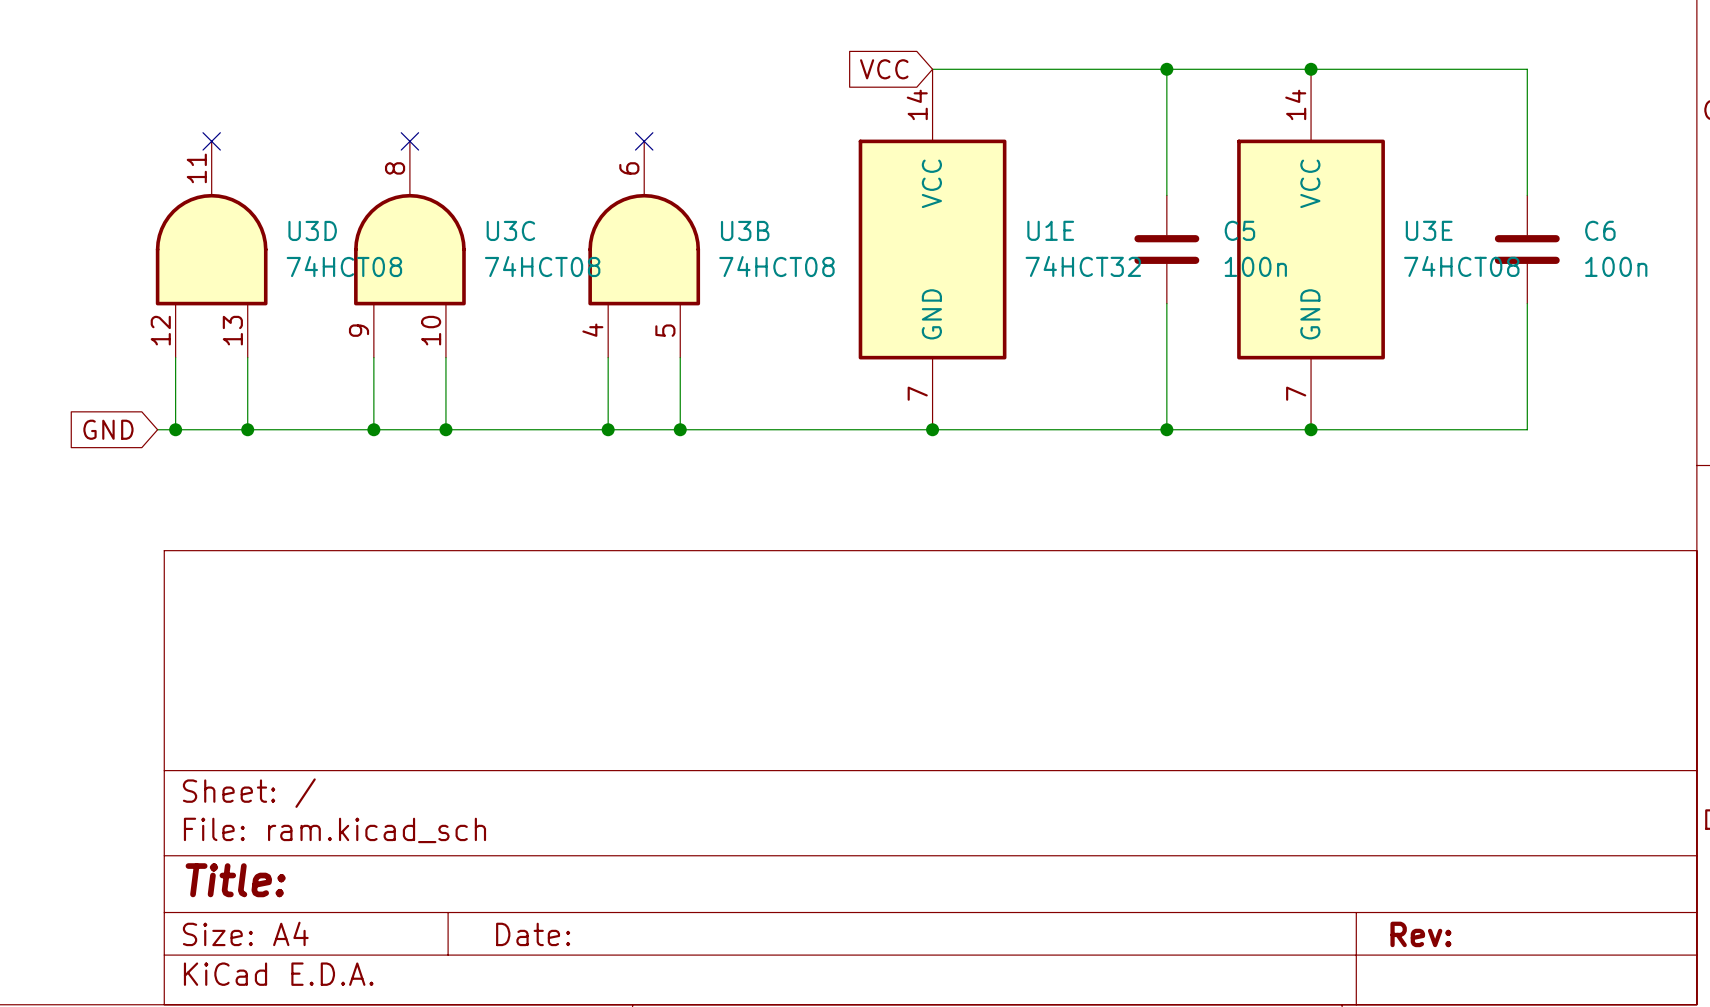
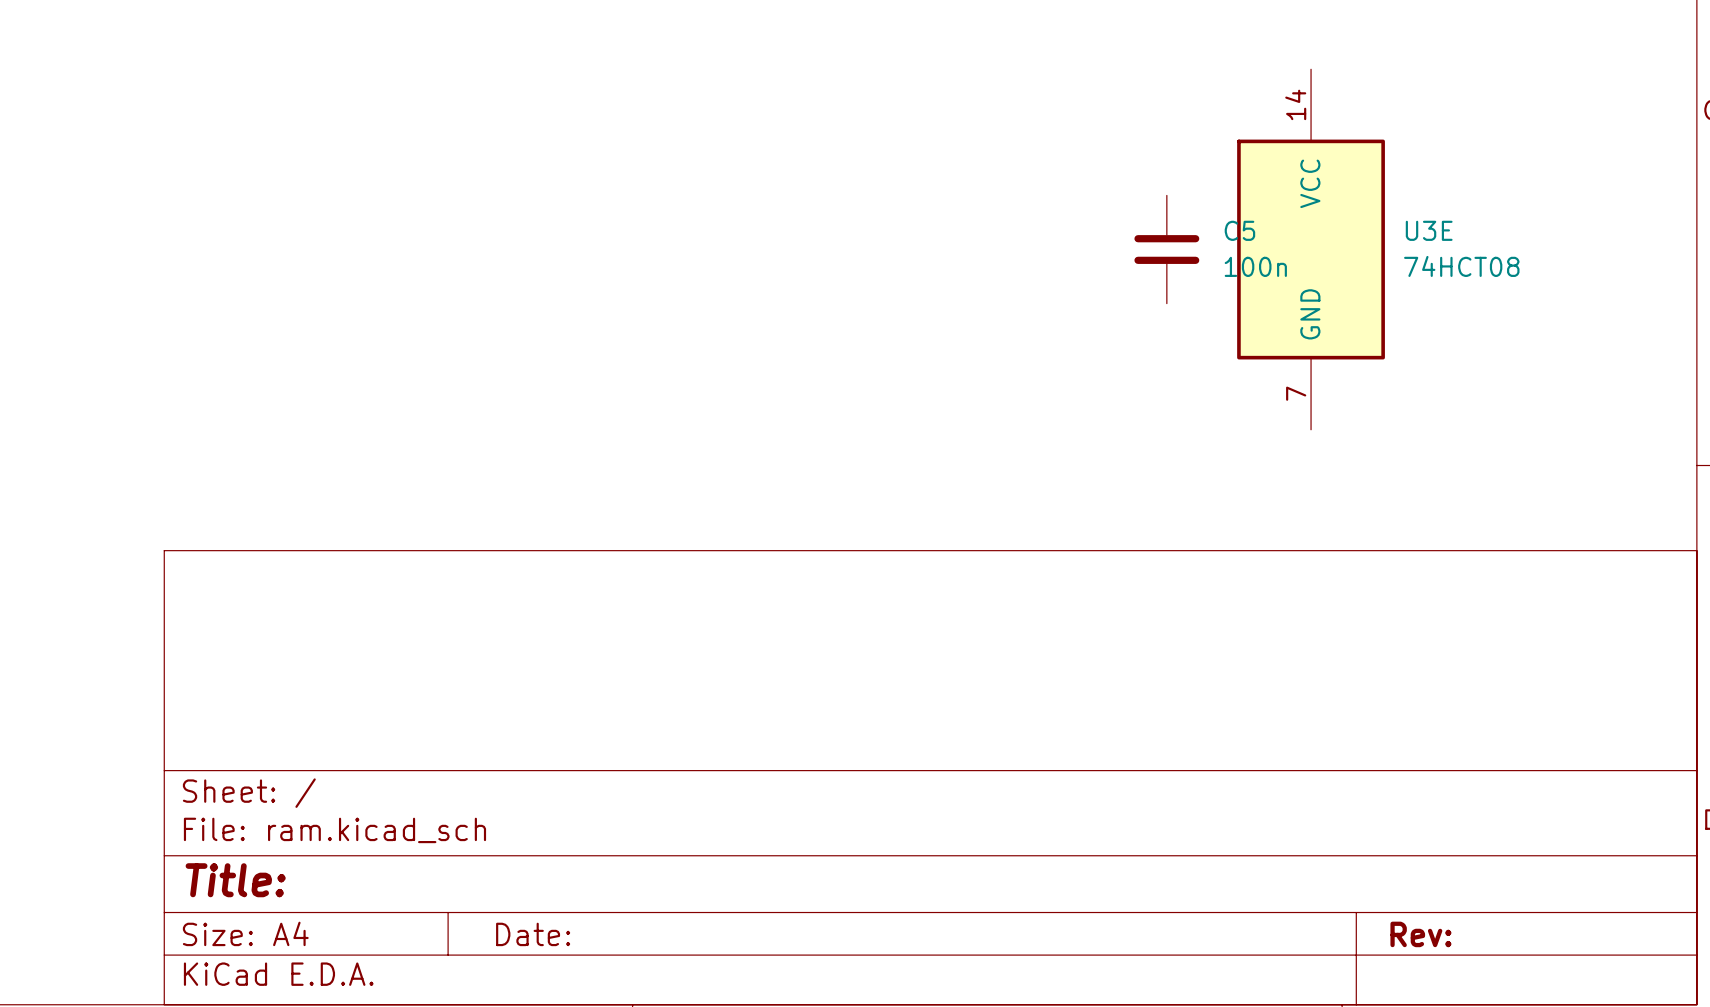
global label: VCC (884, 69) -> none
wire: (932, 69) (1527, 69) (1527, 195) -> none
wire: (1166, 69) (1166, 195) -> none
junction: (1166, 69) -> none
junction: (1311, 69) -> none
no-connect mark: (211, 141) -> none
no-connect mark: (409, 141) -> none
no-connect mark: (644, 141) -> none
U3D: 74HCT08 (211, 249) -> none
U3C: 74HCT08 (409, 249) -> none
U3B: 74HCT08 (644, 249) -> none
U1E: 74HCT32 (932, 249) -> none
C6: 100n (1527, 249) -> none
wire: (1166, 303) (1166, 429) -> none
wire: (1527, 303) (1527, 429) (157, 429) -> none
wire: (175, 357) (175, 429) -> none
wire: (247, 357) (247, 429) -> none
wire: (373, 357) (373, 429) -> none
wire: (445, 357) (445, 429) -> none
wire: (608, 357) (608, 429) -> none
wire: (680, 357) (680, 429) -> none
global label: GND (108, 429) -> none
junction: (175, 429) -> none
junction: (247, 429) -> none
junction: (373, 429) -> none
junction: (445, 429) -> none
junction: (608, 429) -> none
junction: (680, 429) -> none
junction: (932, 429) -> none
junction: (1166, 429) -> none
junction: (1311, 429) -> none

